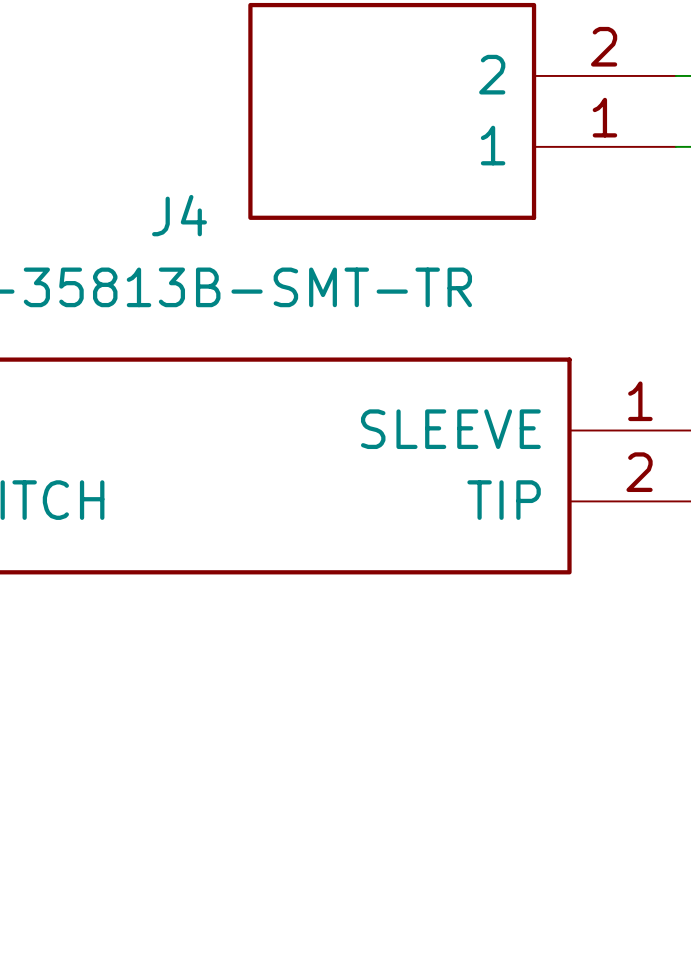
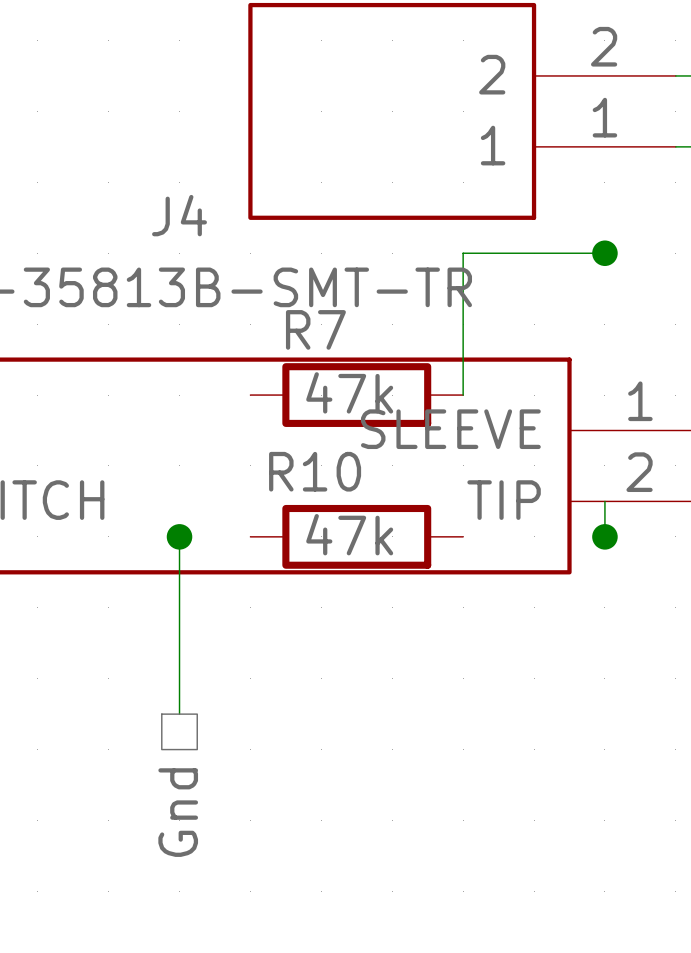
wire: none -> (604, 253) (463, 253) (463, 395)
junction: none -> (604, 253)
R7: none -> 47k (356, 395)
wire: none -> (604, 501) (604, 536)
wire: none -> (179, 536) (179, 714)
junction: none -> (179, 536)
R10: none -> 47k (356, 536)
junction: none -> (604, 536)
hierarchical label: none -> Gnd (178, 812)

